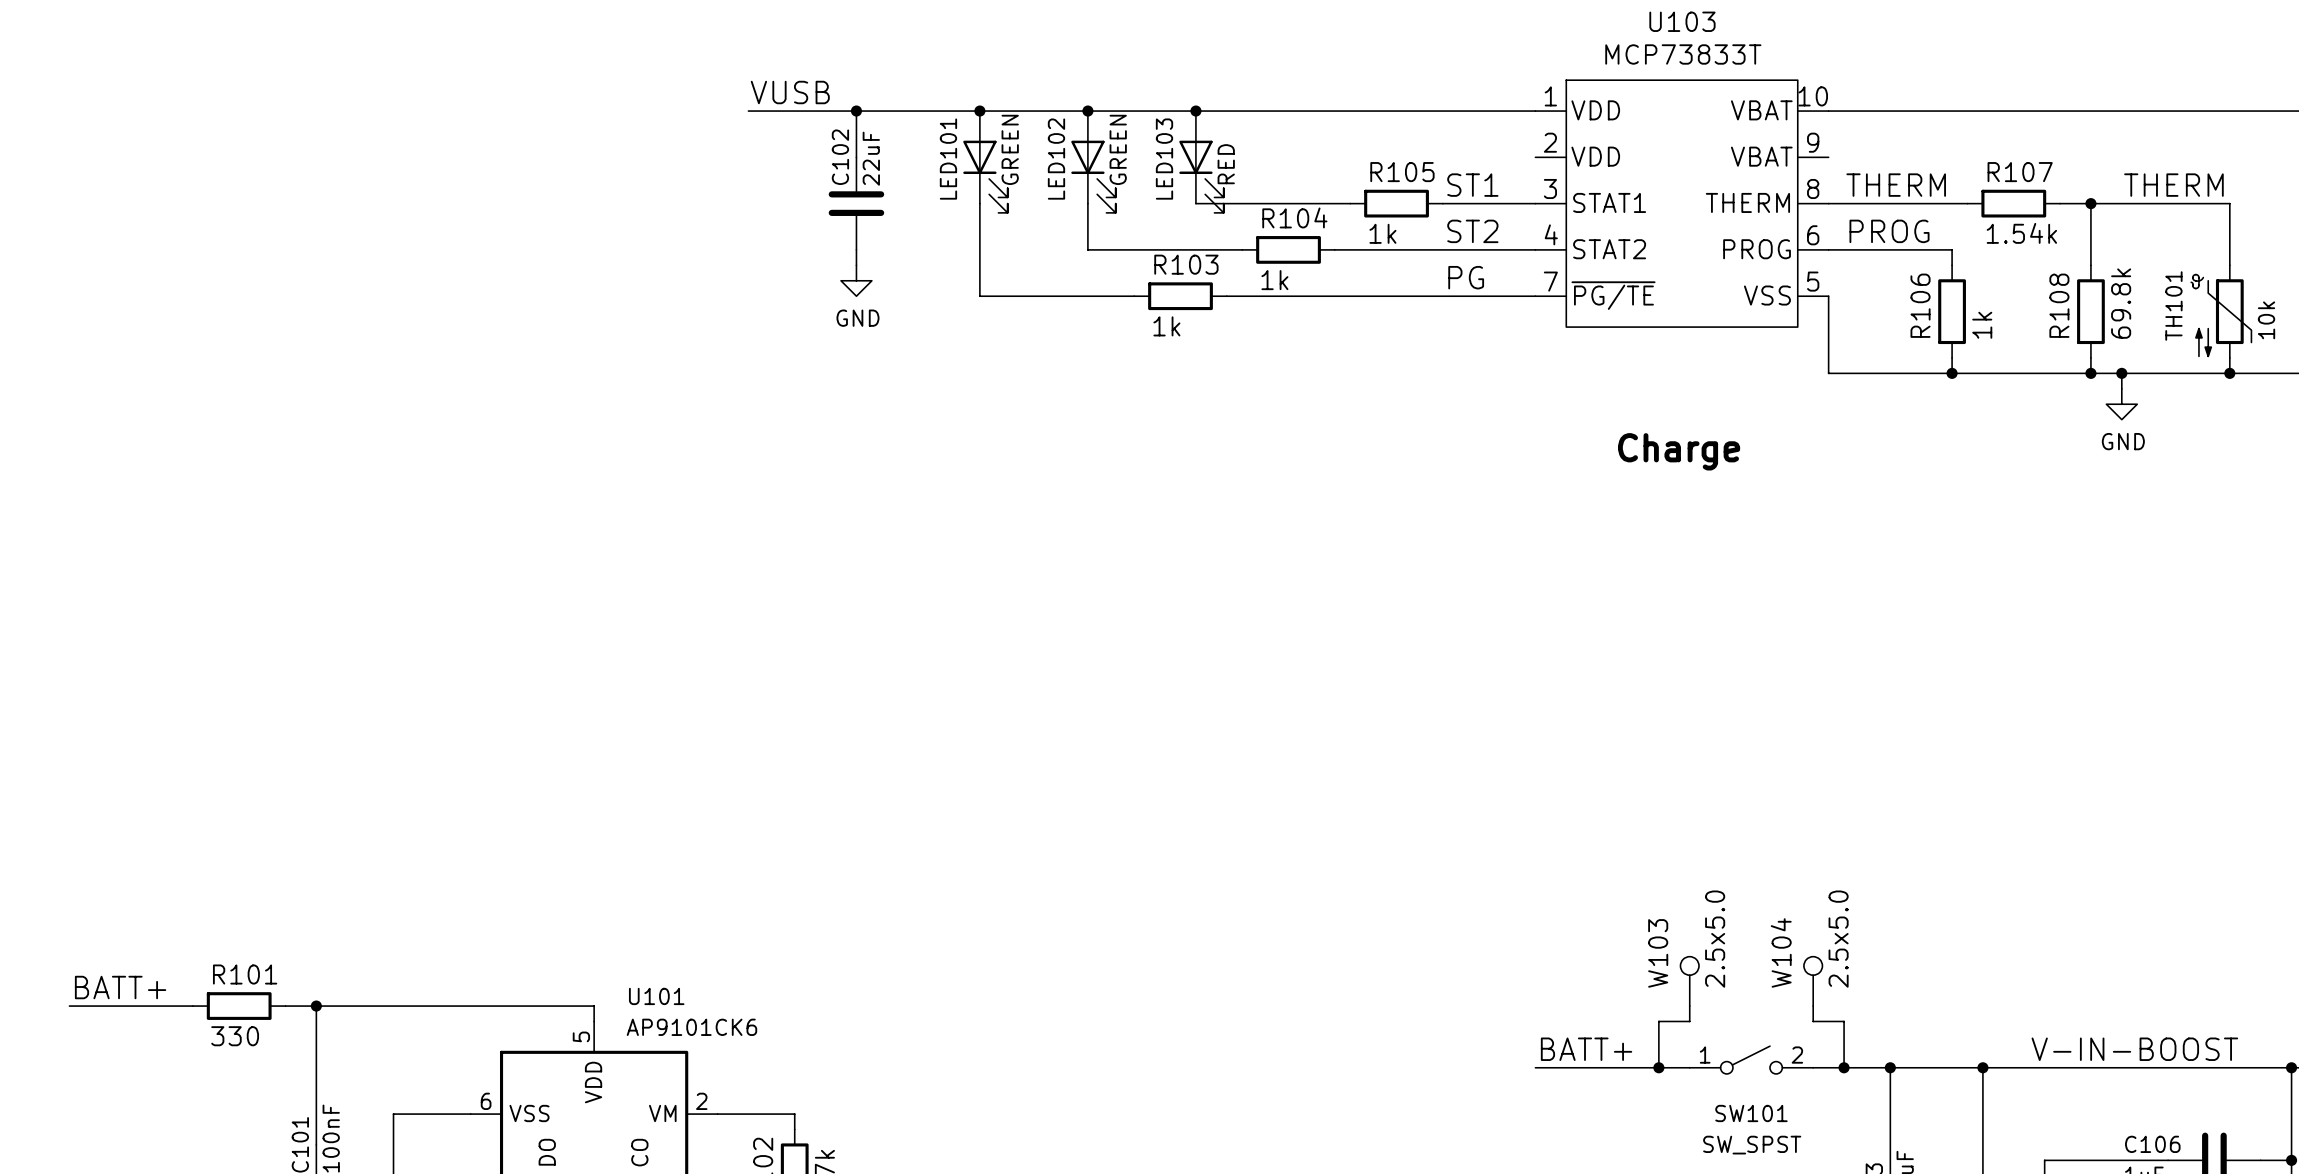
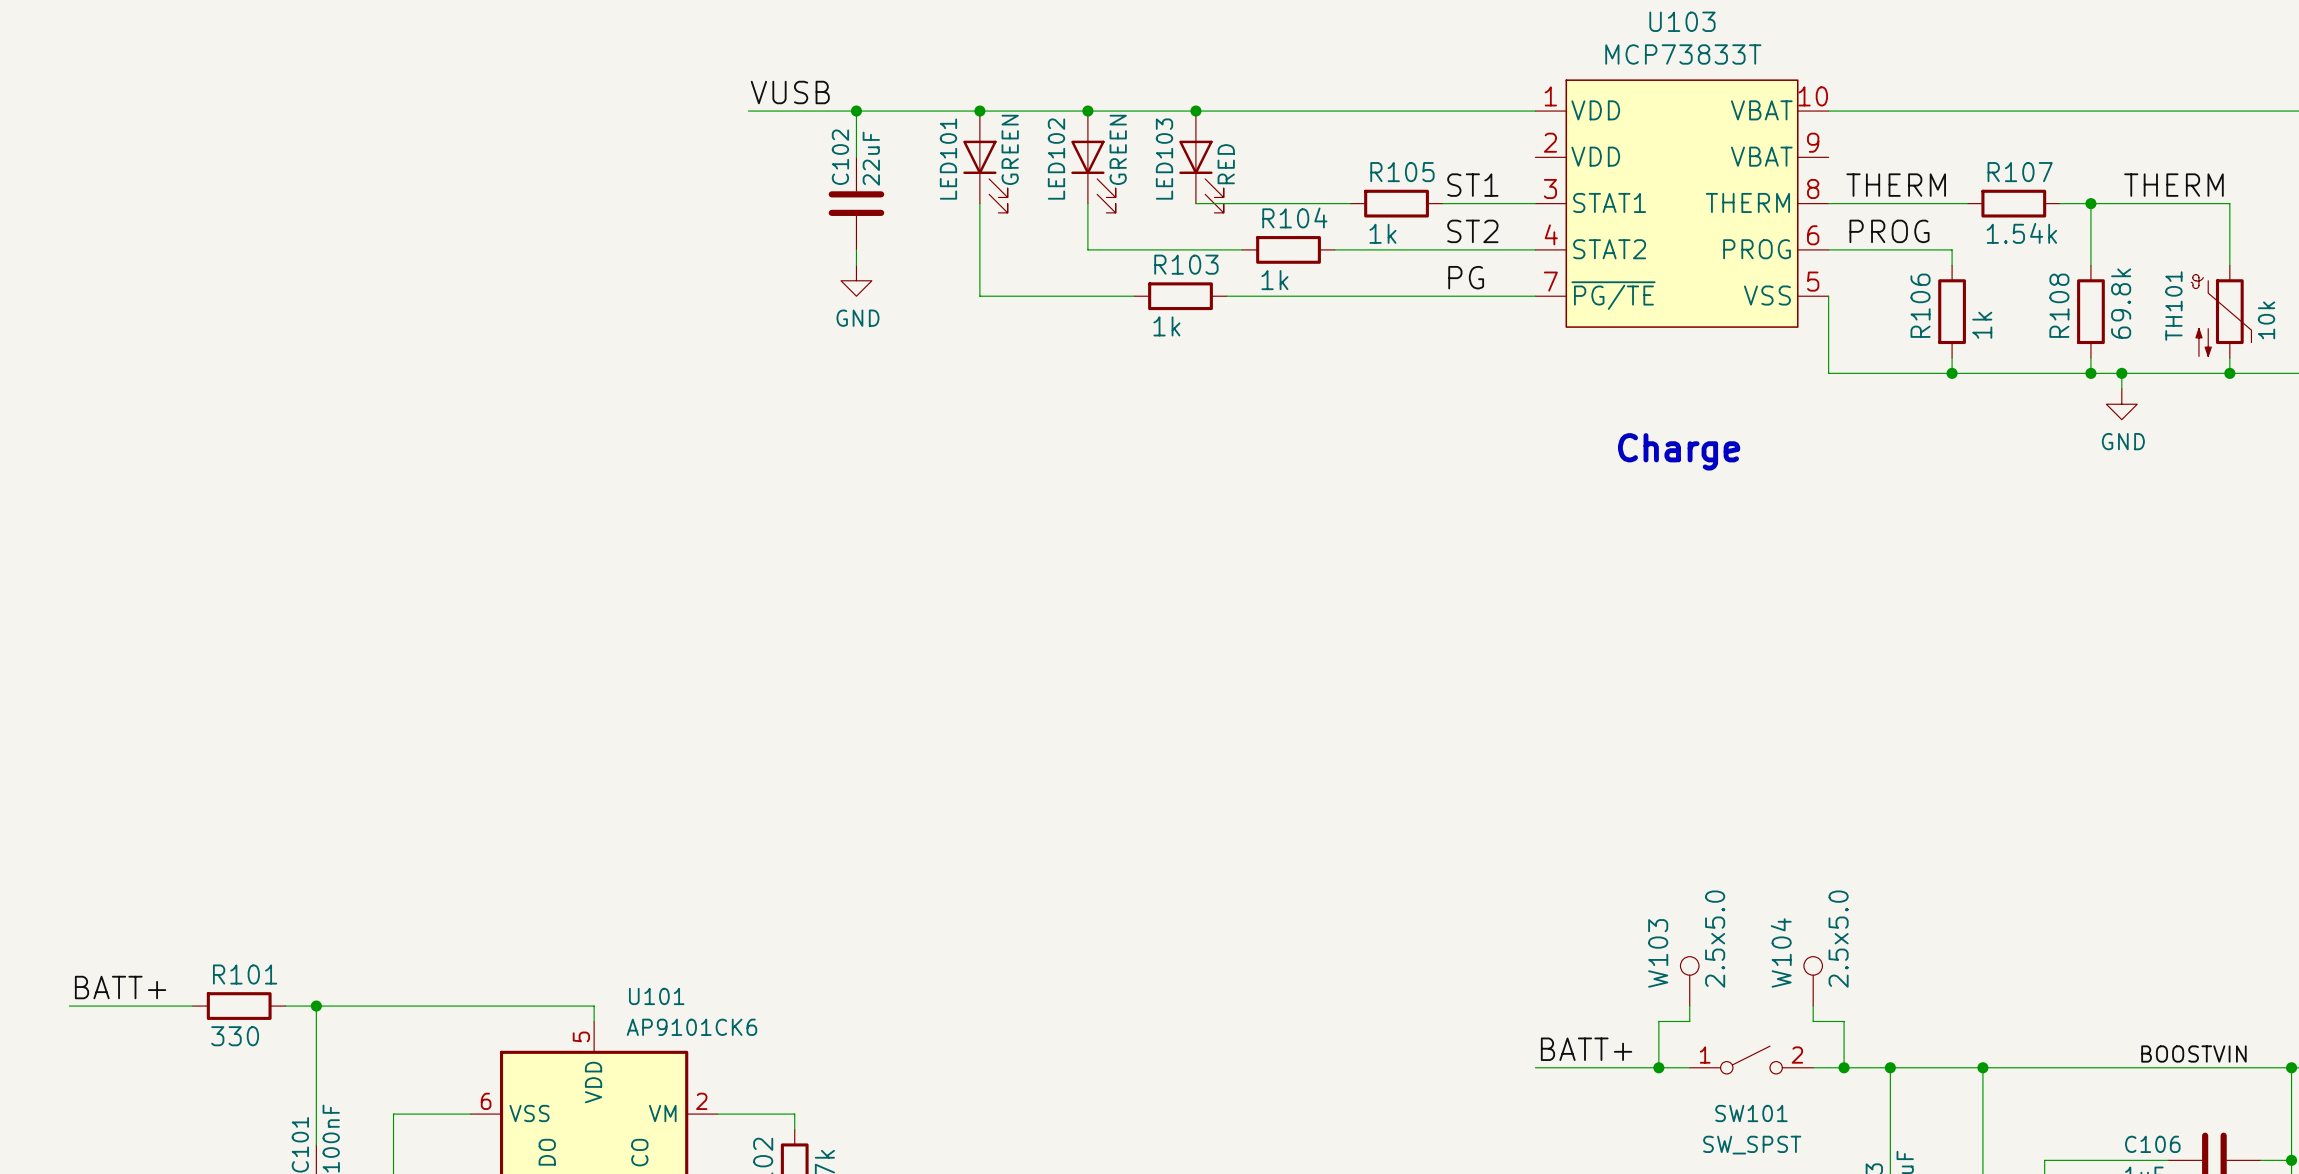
label: V-IN-BOOST (2134, 1049) -> none
label: none -> BOOSTVIN (2193, 1054)

